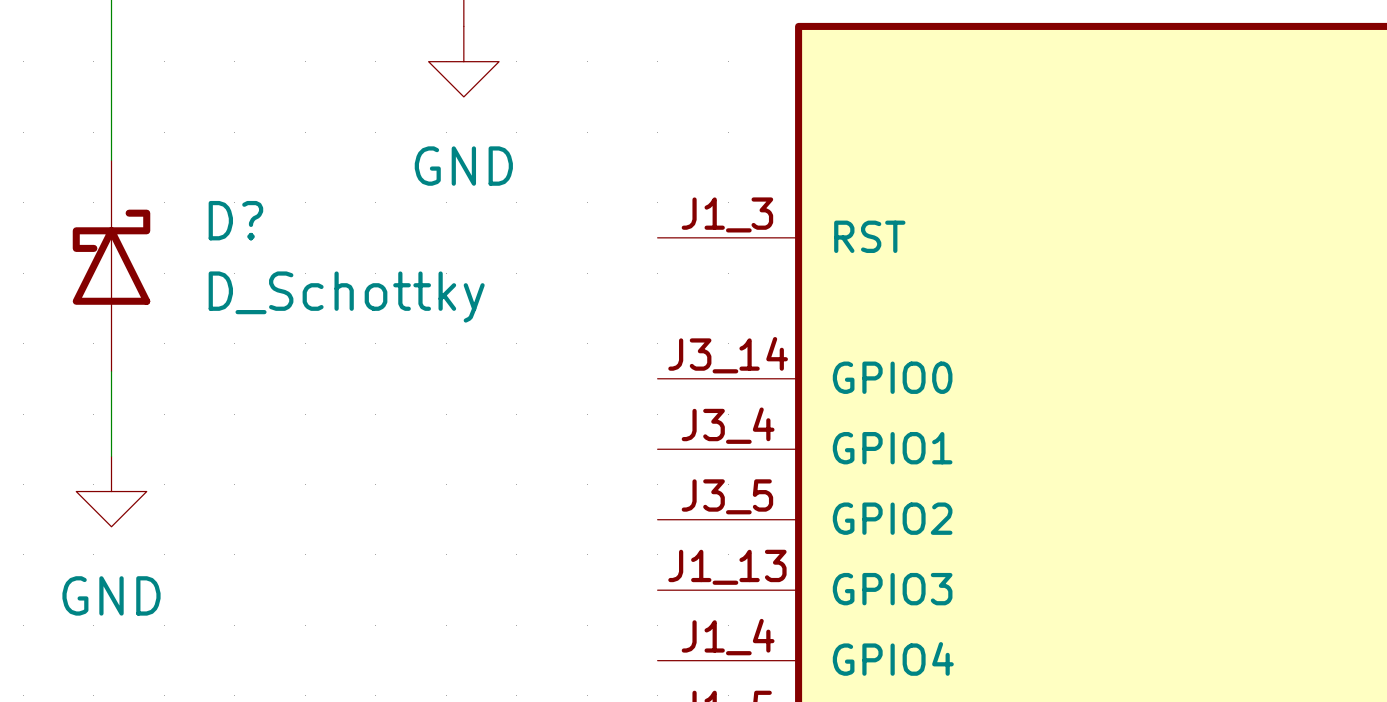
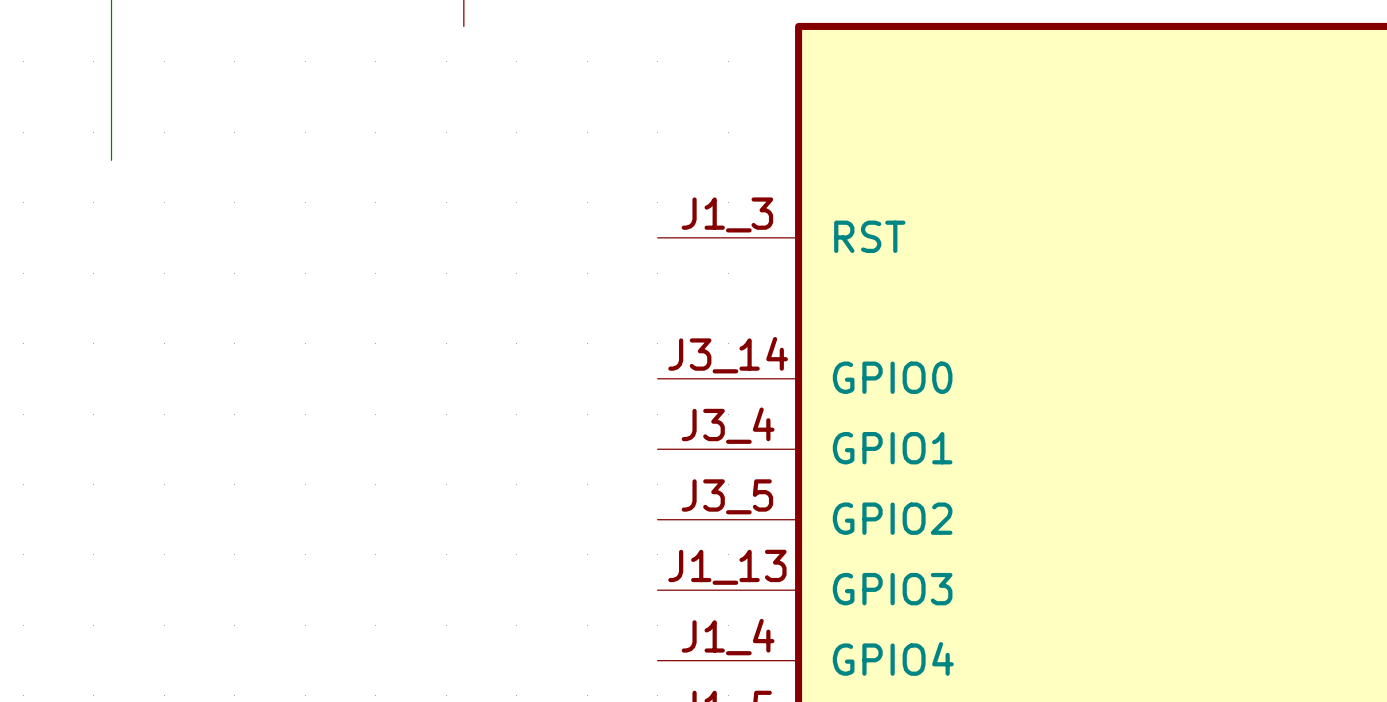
power symbol: GND (463, 61) -> none
D?: D_Schottky (111, 266) -> none
wire: (111, 371) (111, 456) -> none
power symbol: GND (111, 491) -> none

